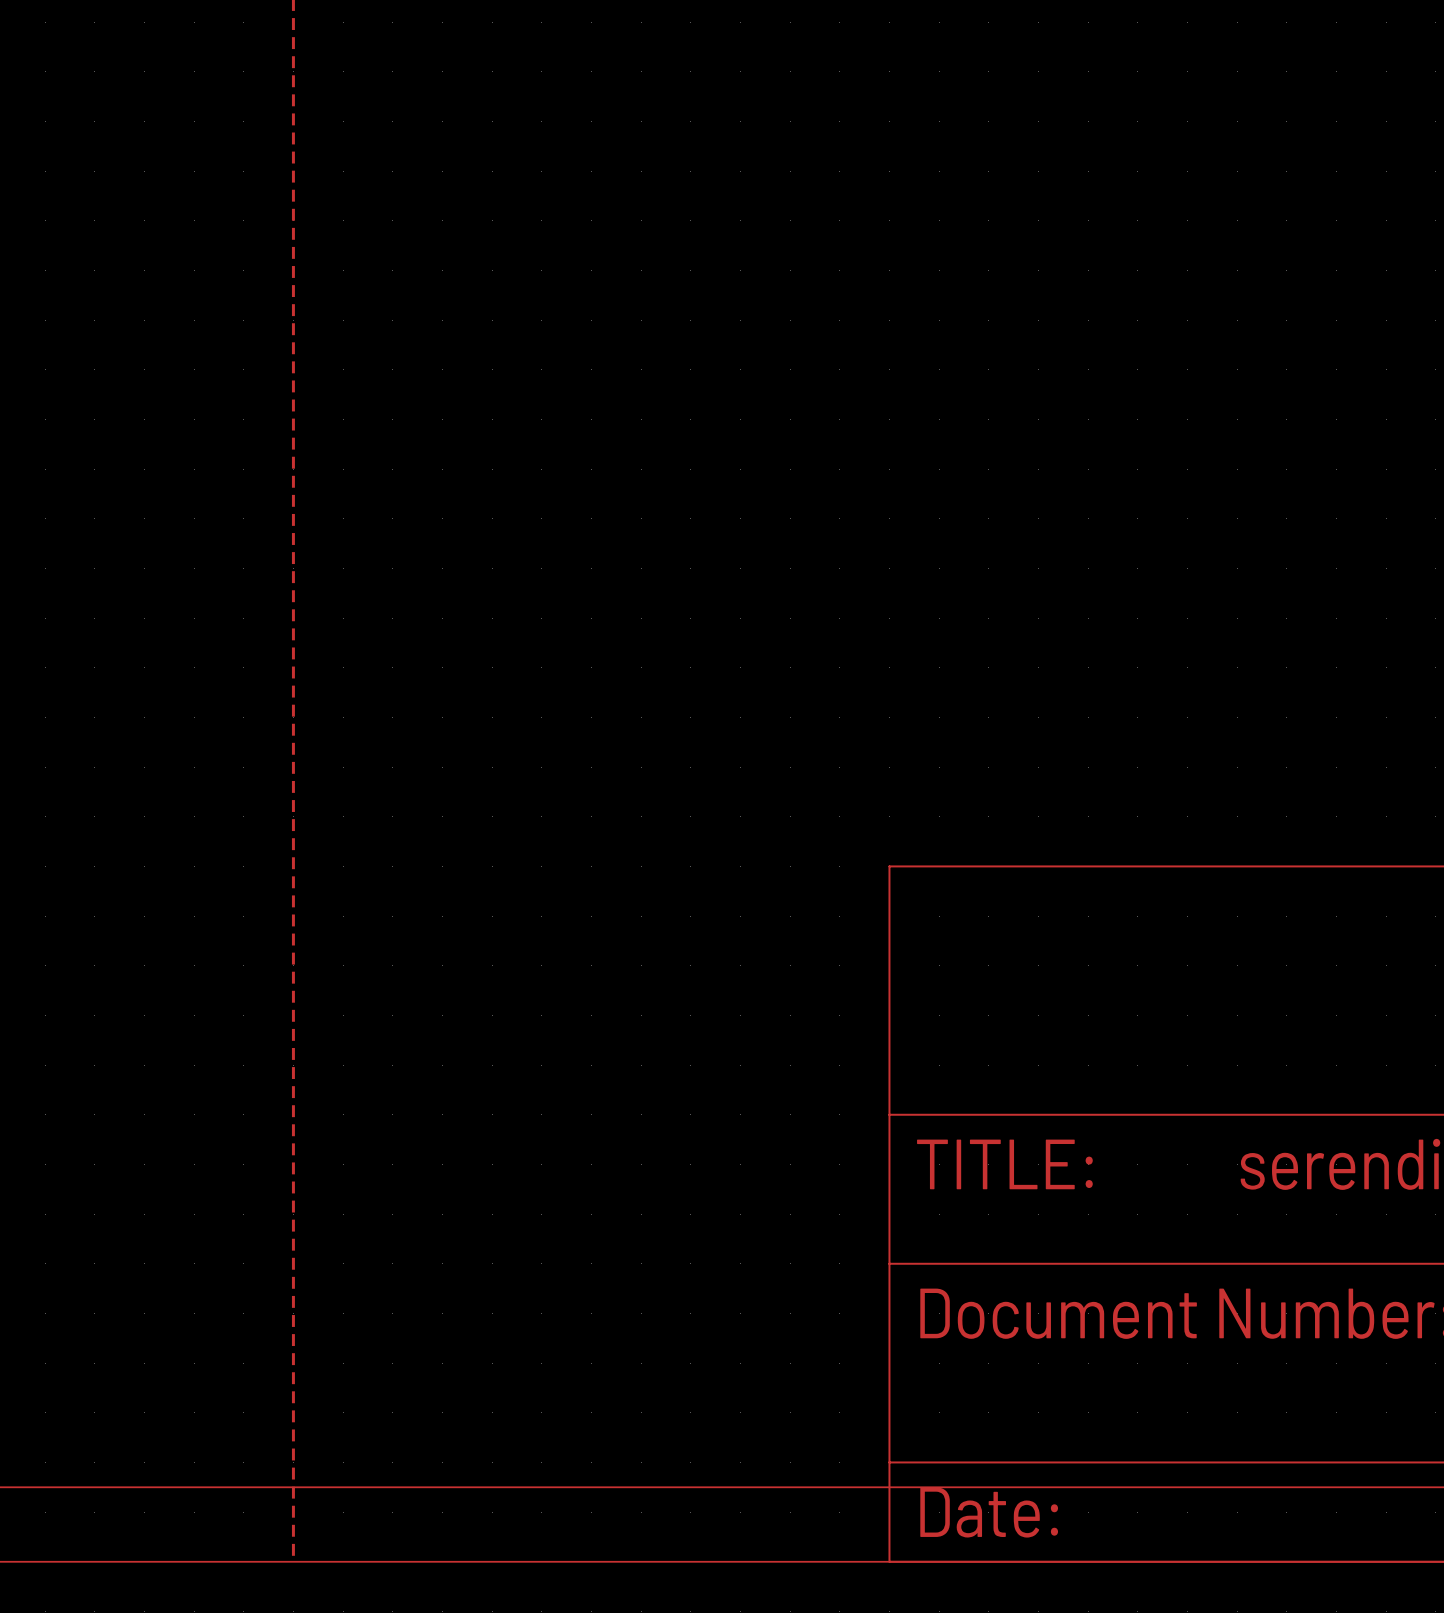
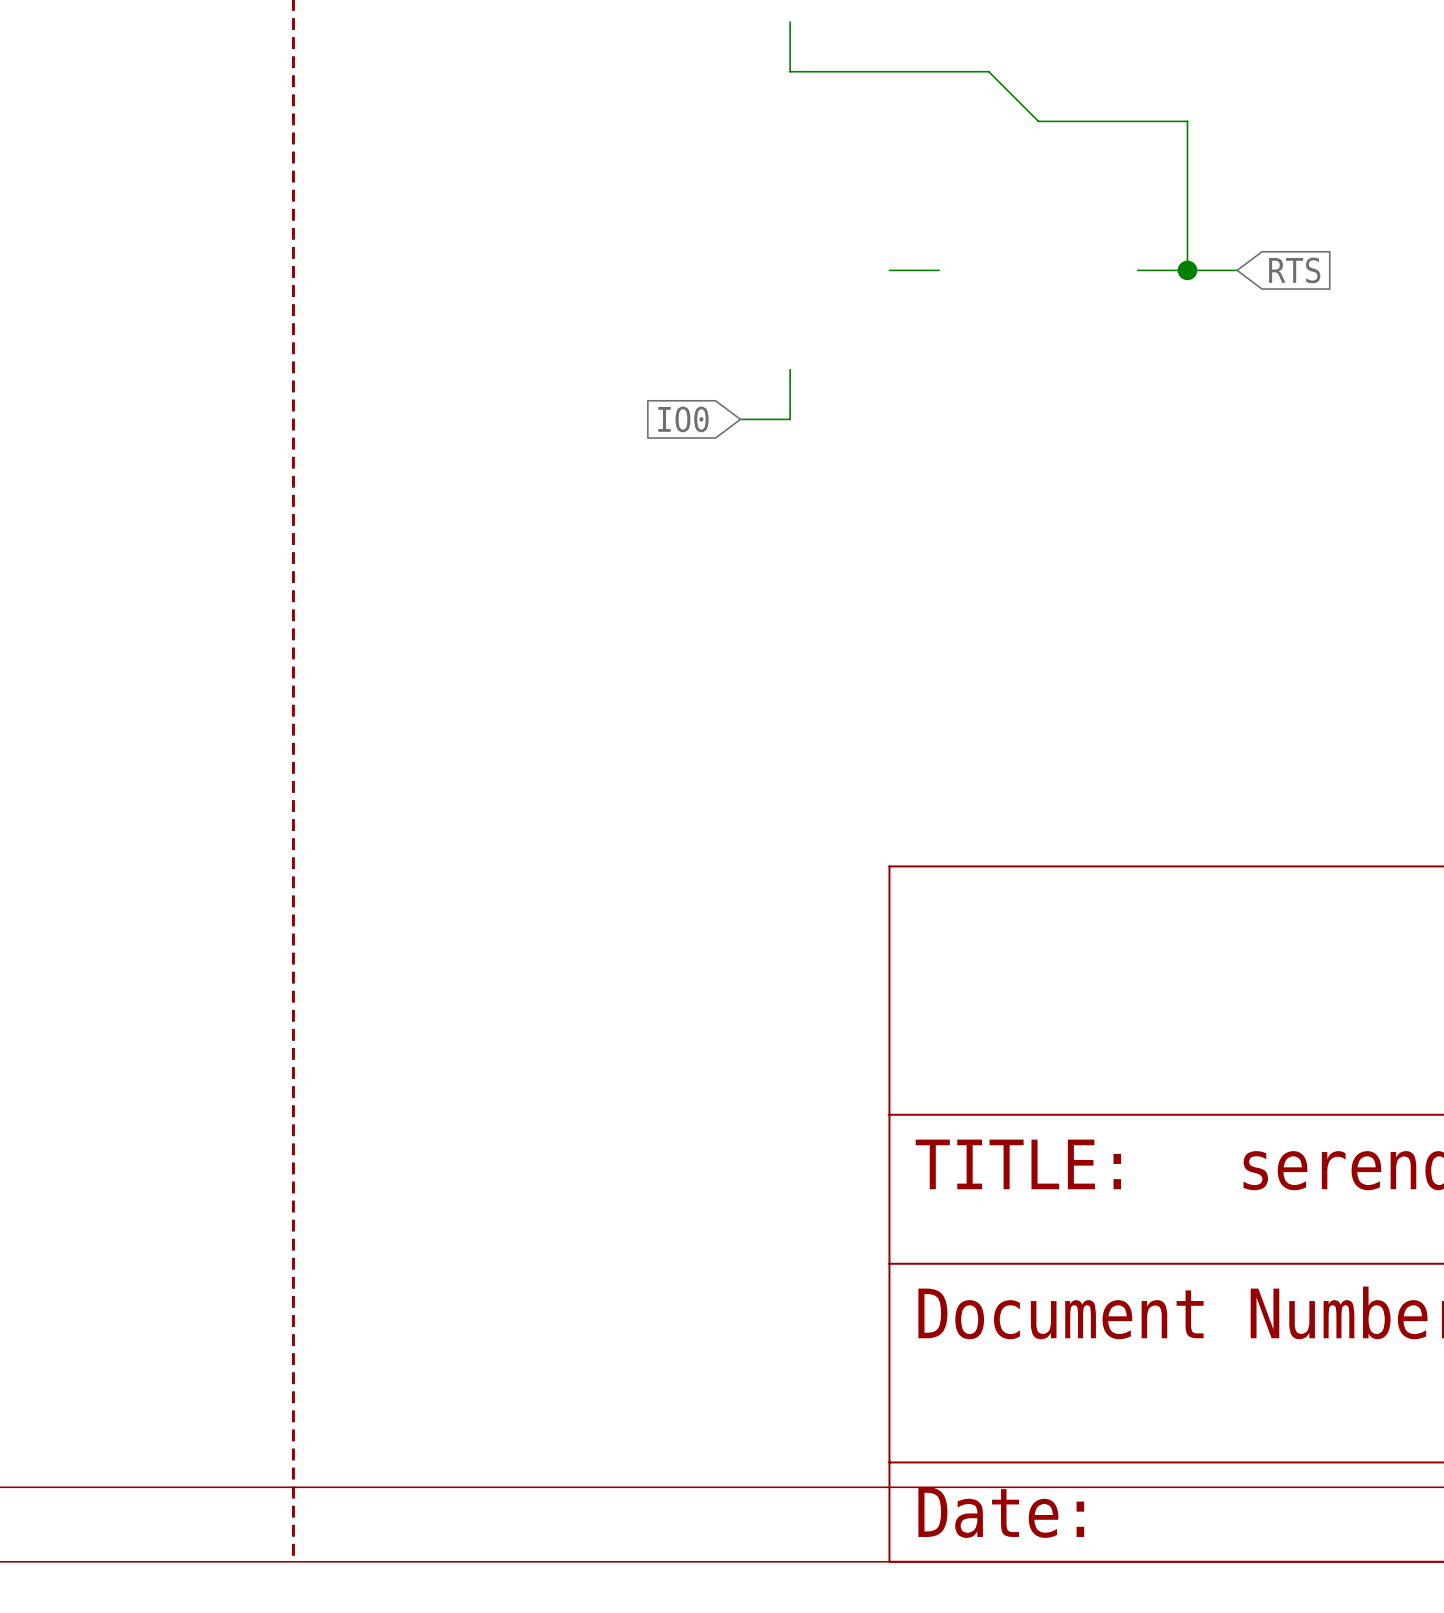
wire: none -> (790, 22) (790, 71) (988, 71) (1038, 121) (1187, 121) (1187, 270)
wire: none -> (889, 270) (939, 270)
wire: none -> (1137, 270) (1237, 270)
junction: none -> (1187, 270)
global label: none -> RTS (1294, 270)
wire: none -> (790, 369) (790, 419) (740, 419)
global label: none -> IO0 (683, 419)

